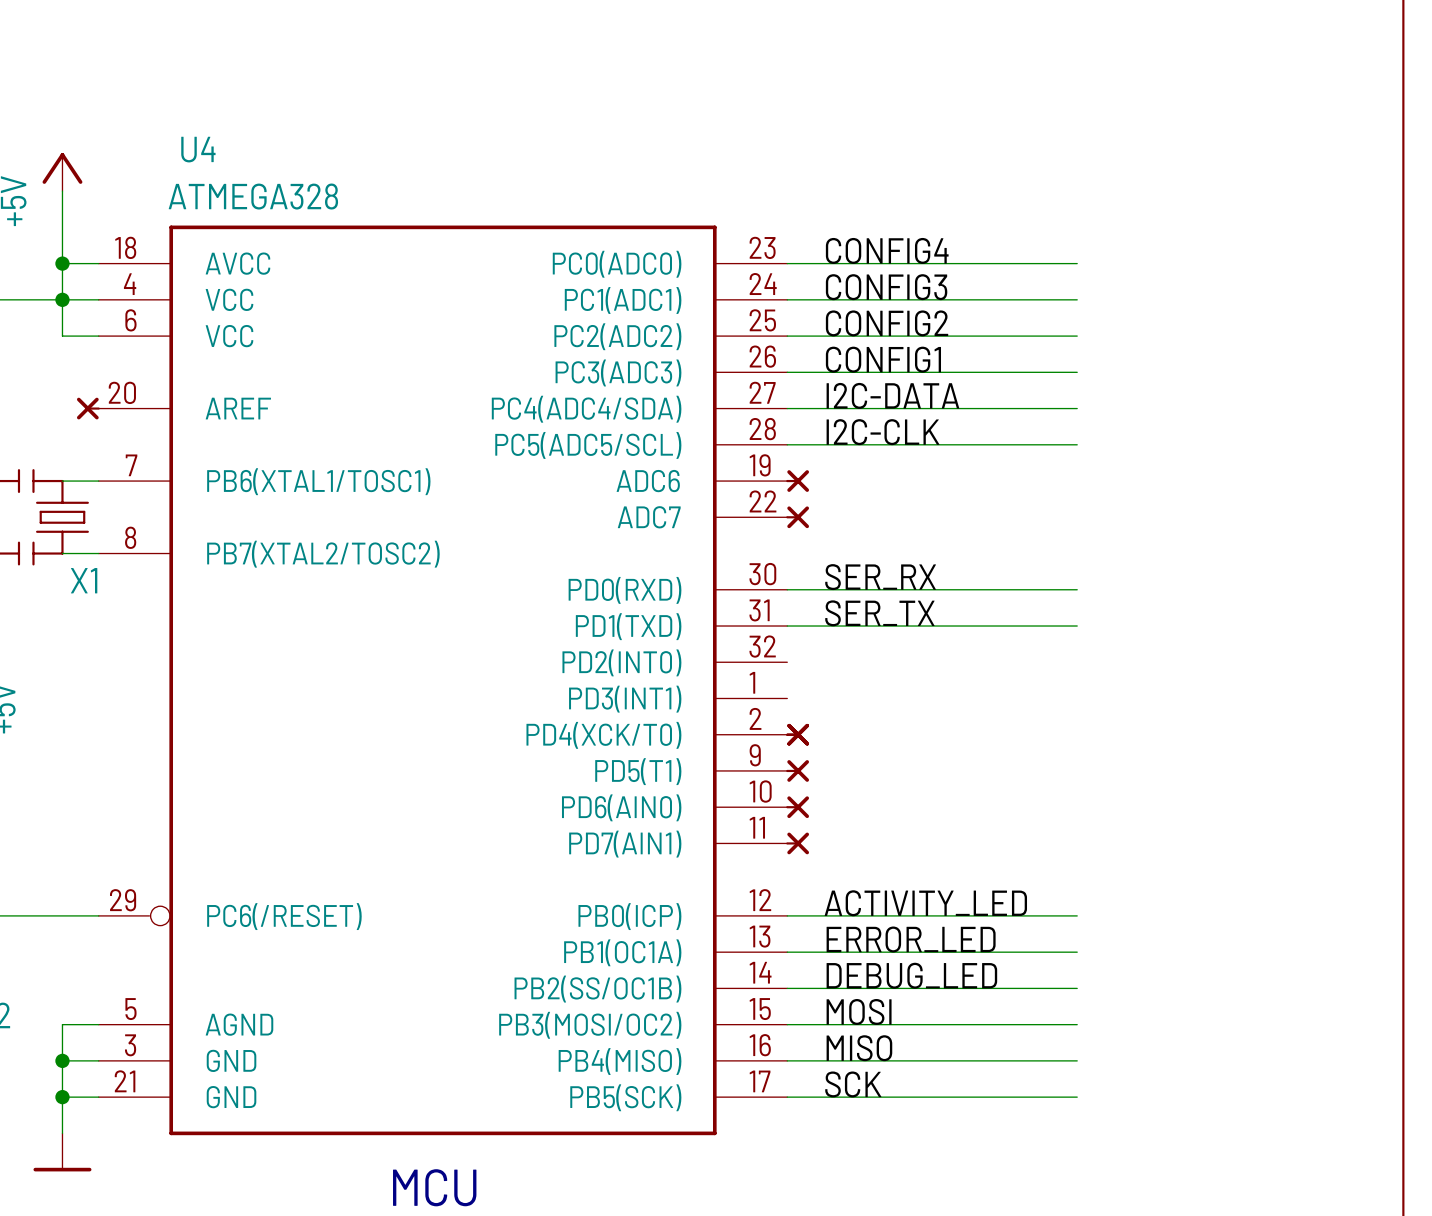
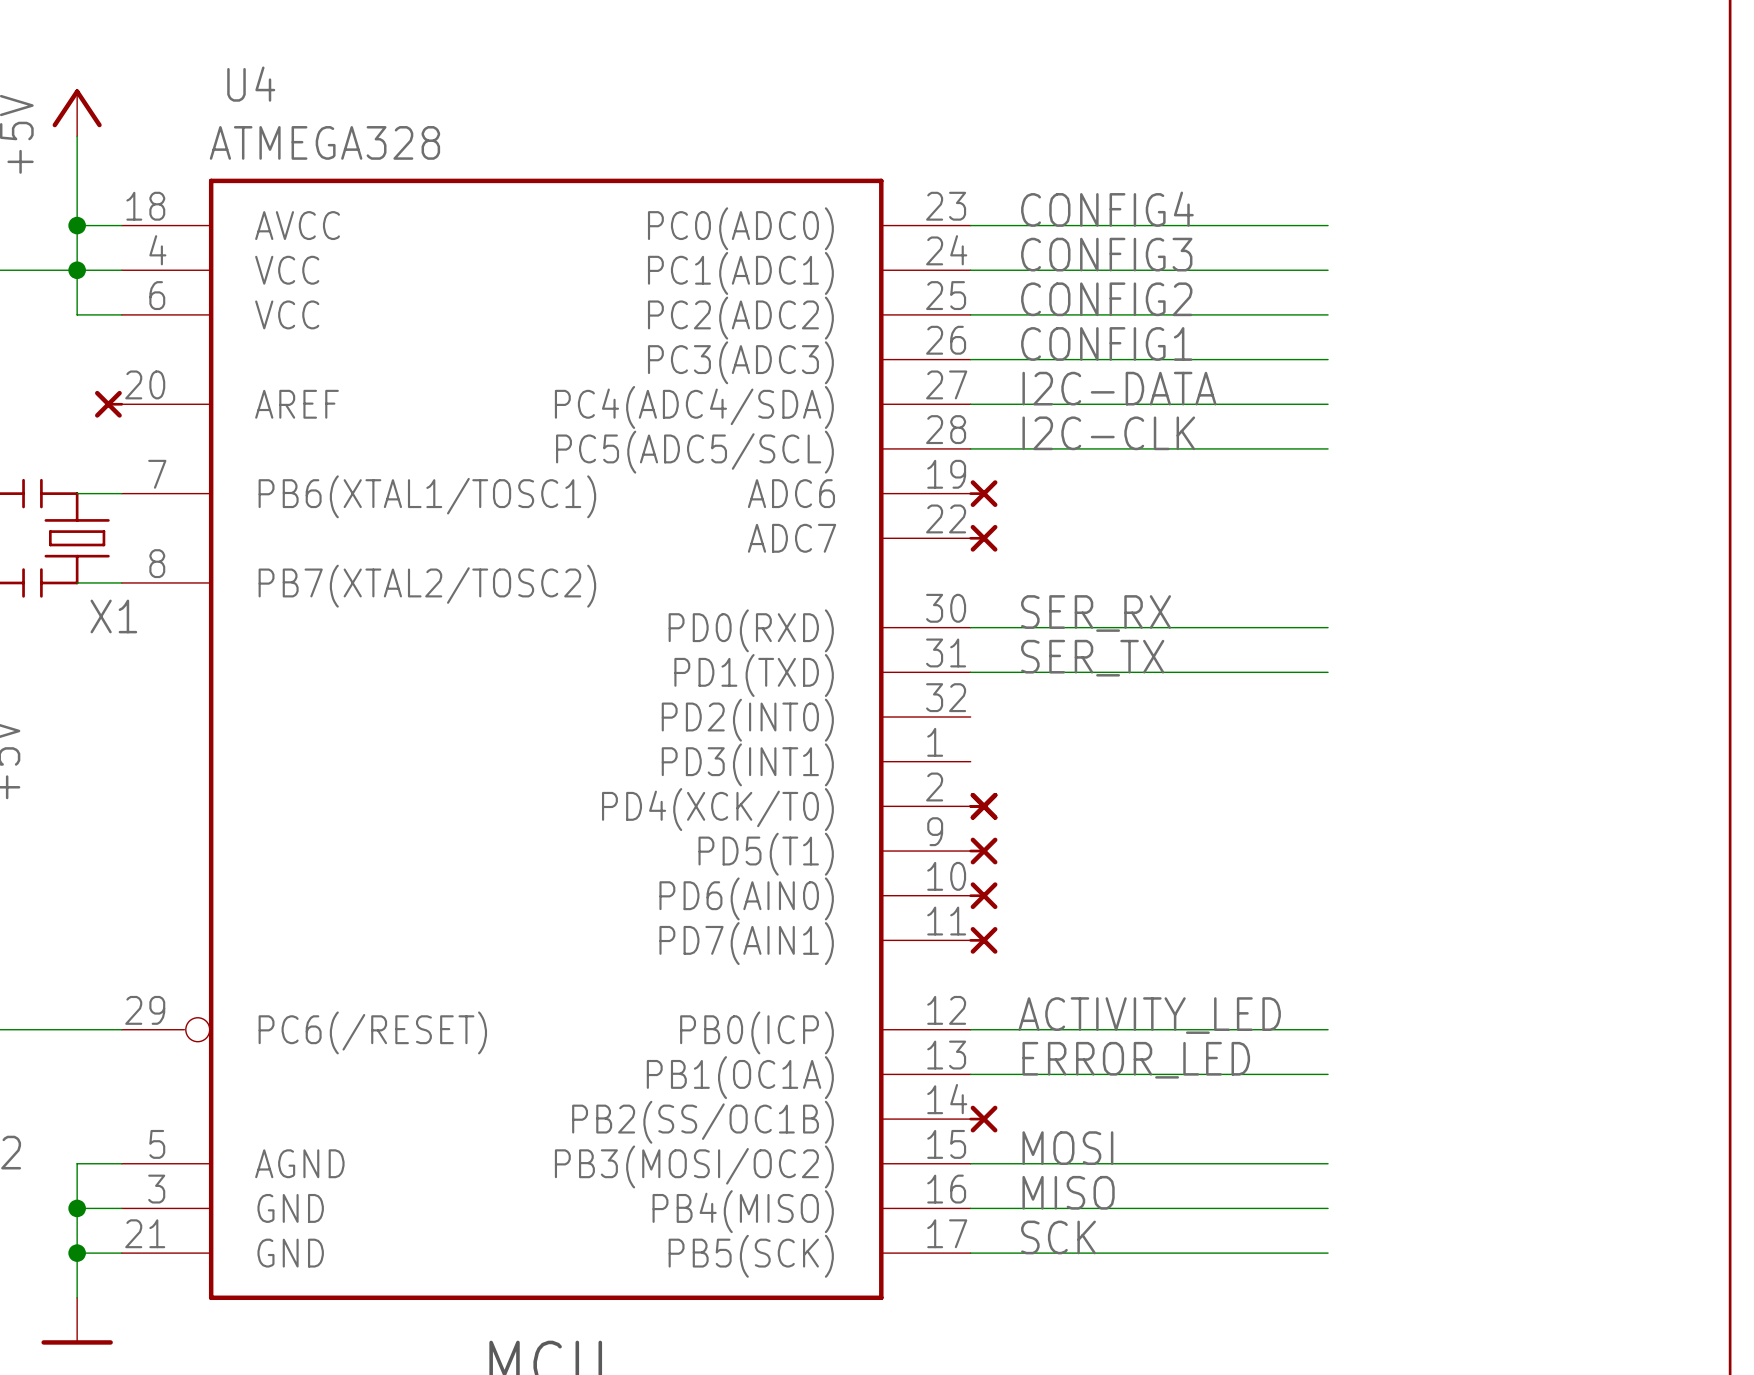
label: DEBUG_LED (911, 975) -> none
wire: (787, 988) (1077, 988) -> none
part: none -> (983, 1119)

